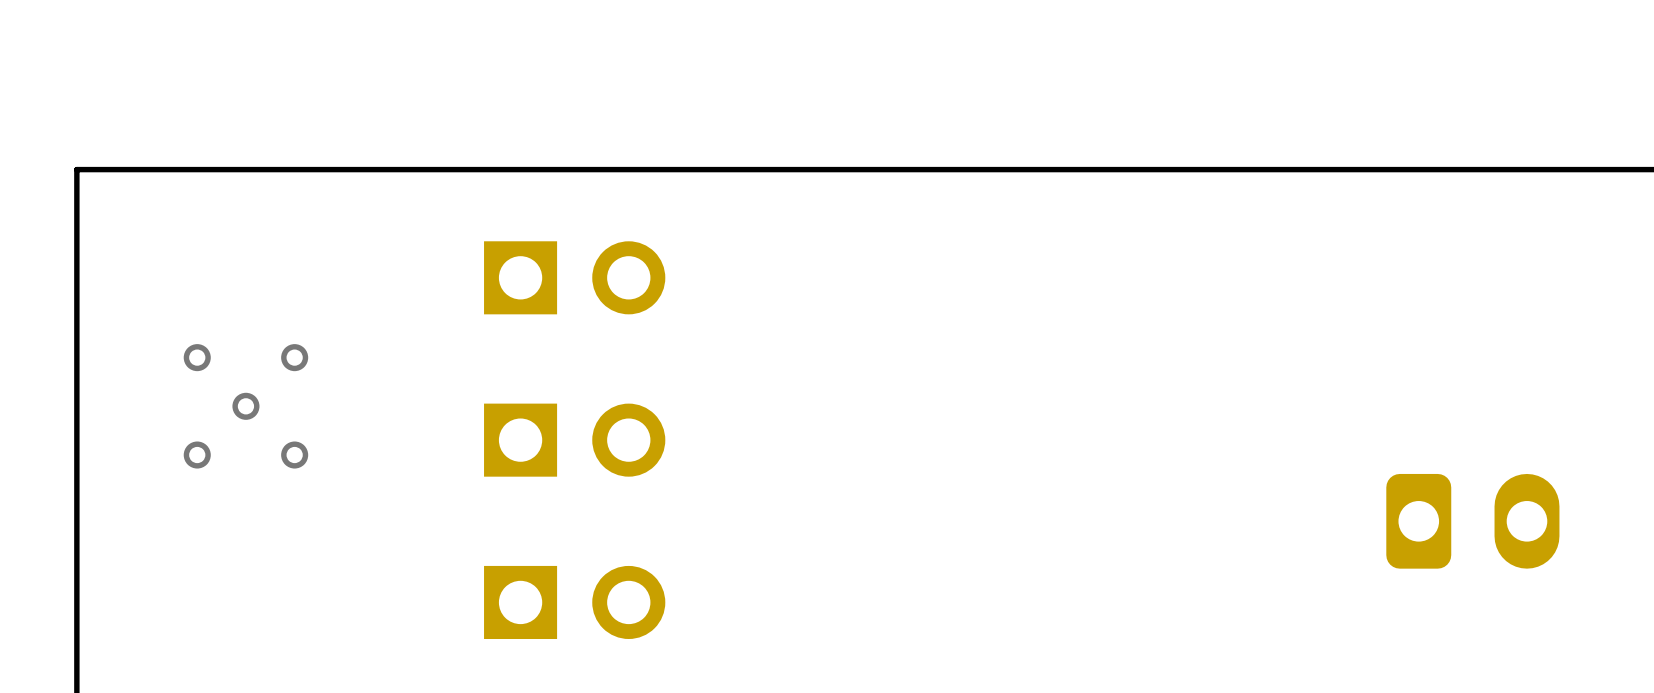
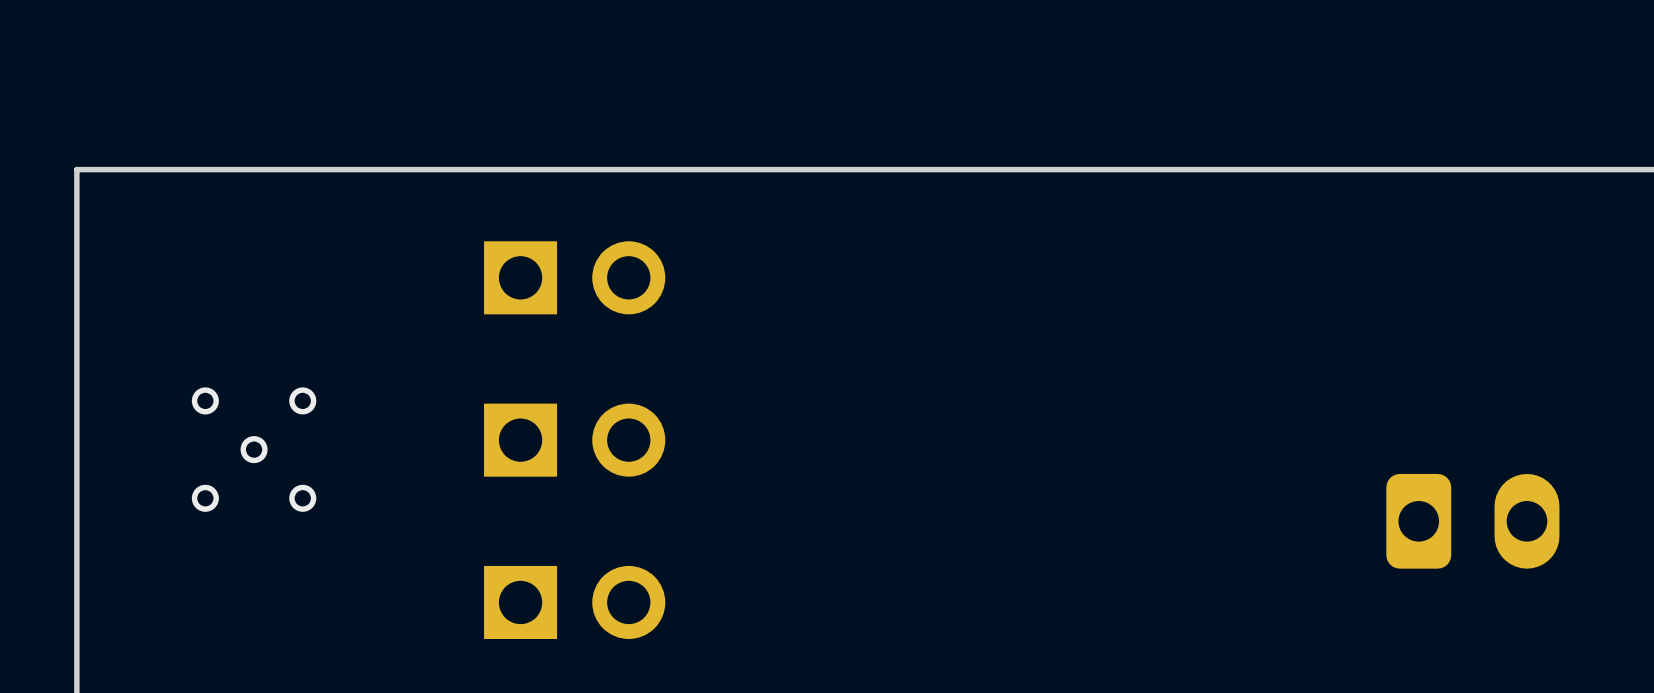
via: (197, 357) -> none
via: (294, 357) -> none
via: none -> (205, 400)
via: none -> (302, 400)
via: (245, 406) -> none
via: none -> (254, 449)
via: (197, 455) -> none
via: (294, 455) -> none
via: none -> (205, 498)
via: none -> (302, 498)

